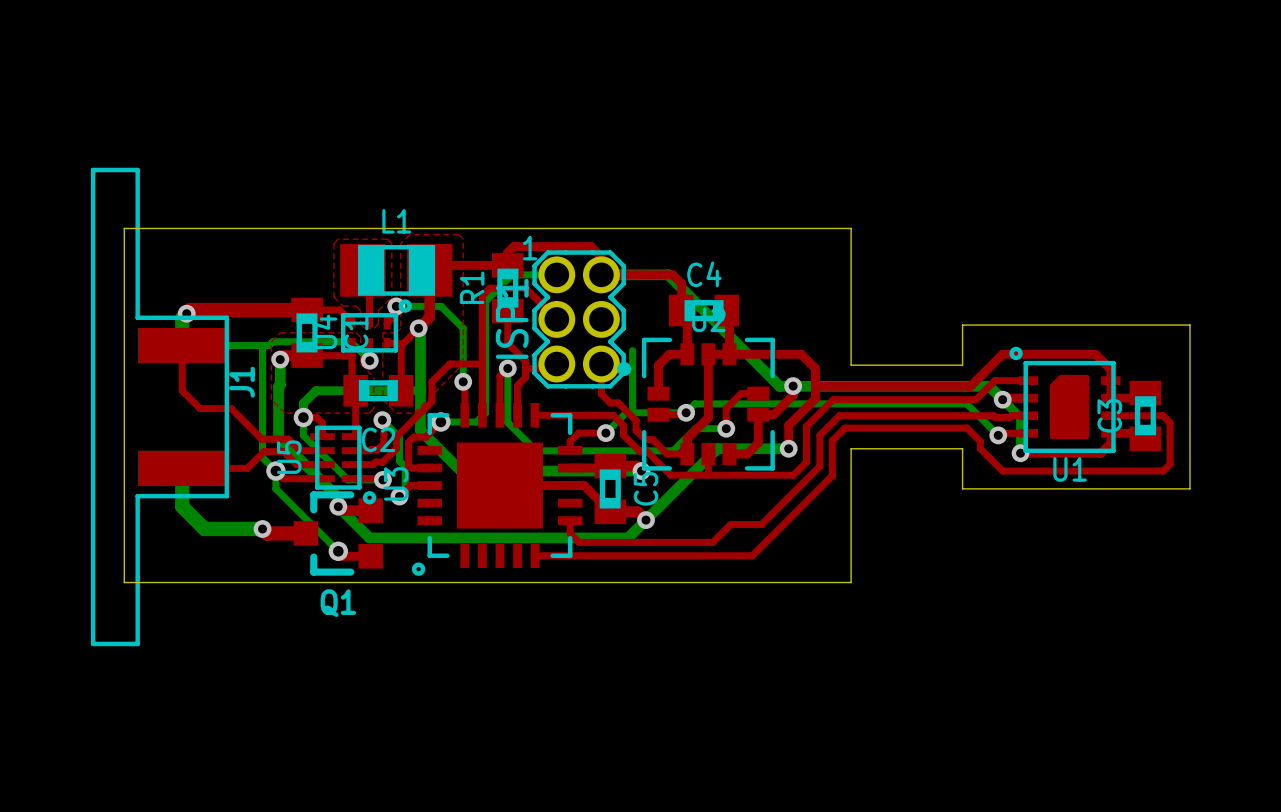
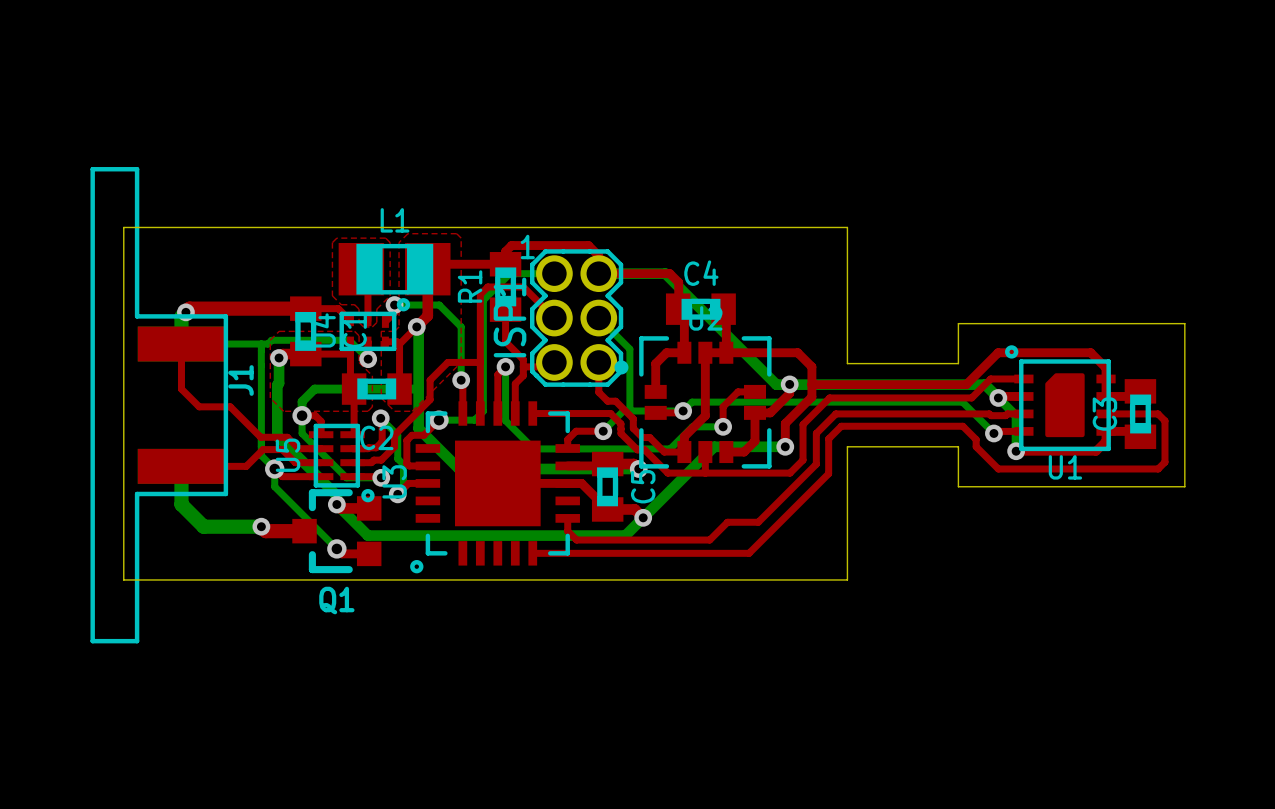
bottom track: none -> (598, 318) (629, 349)

